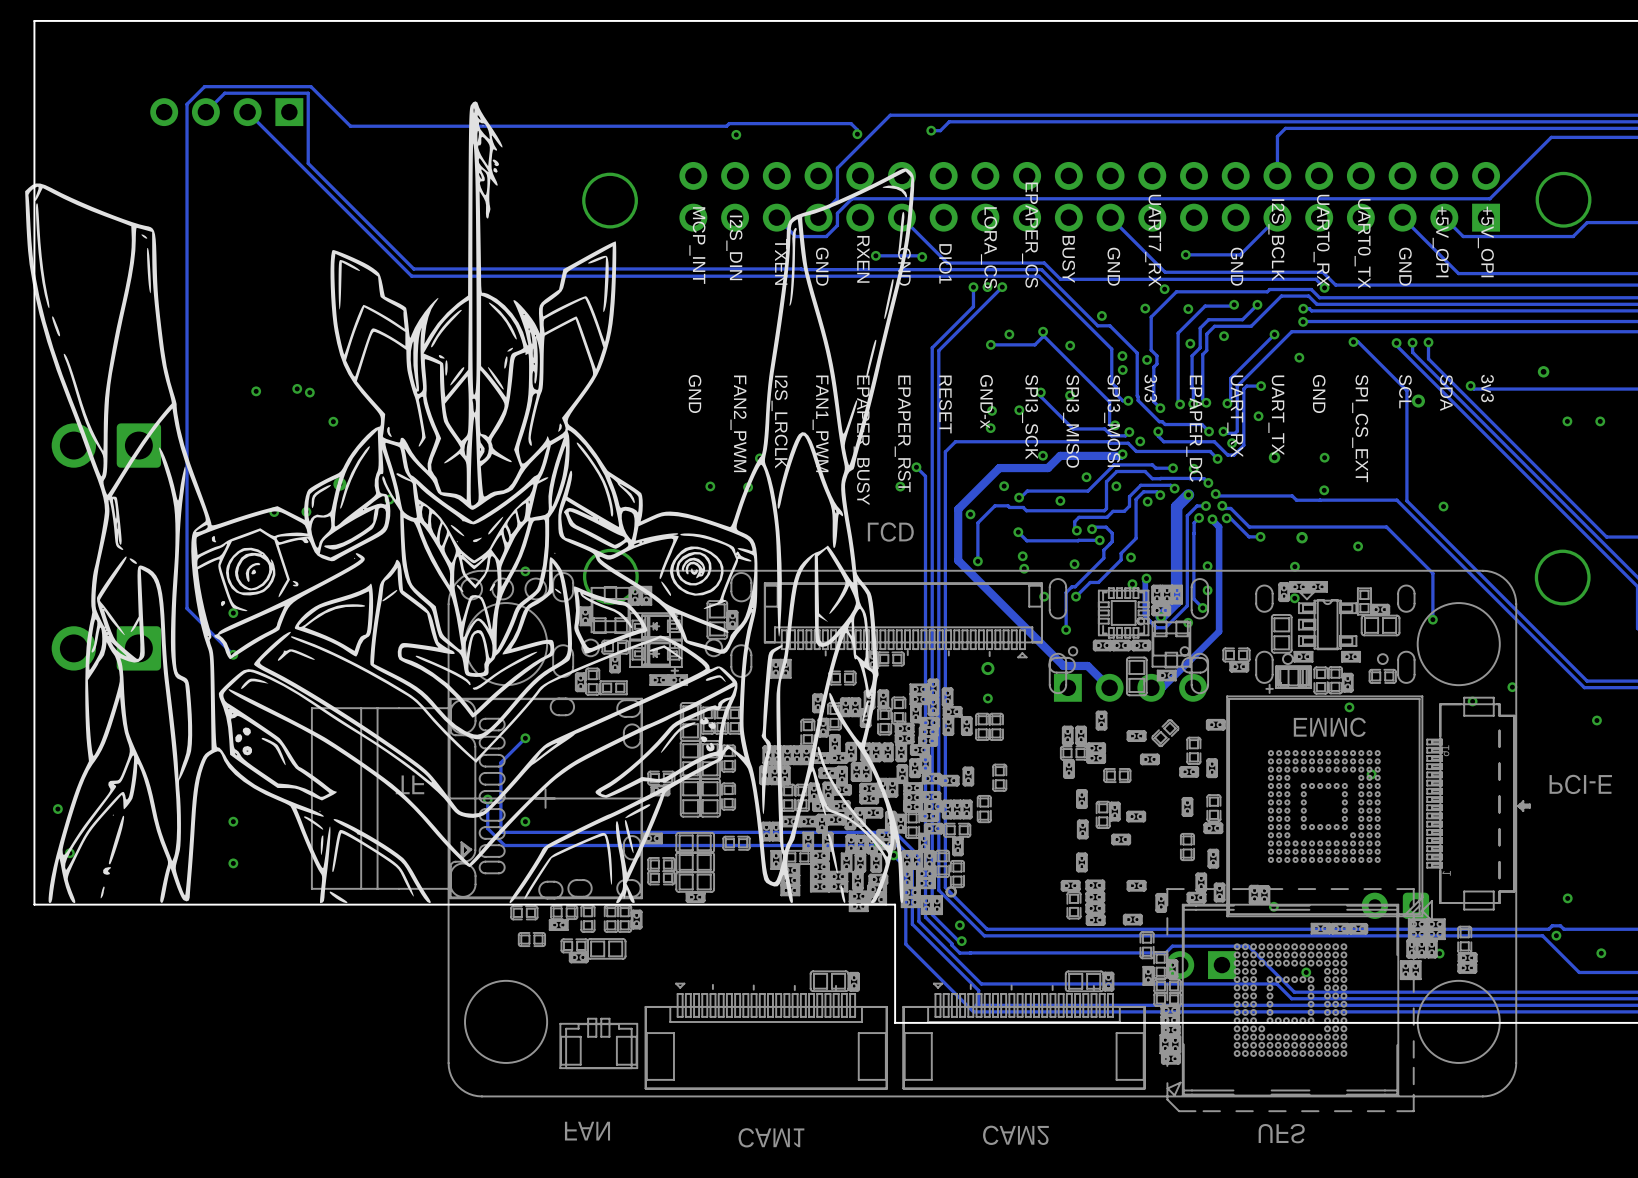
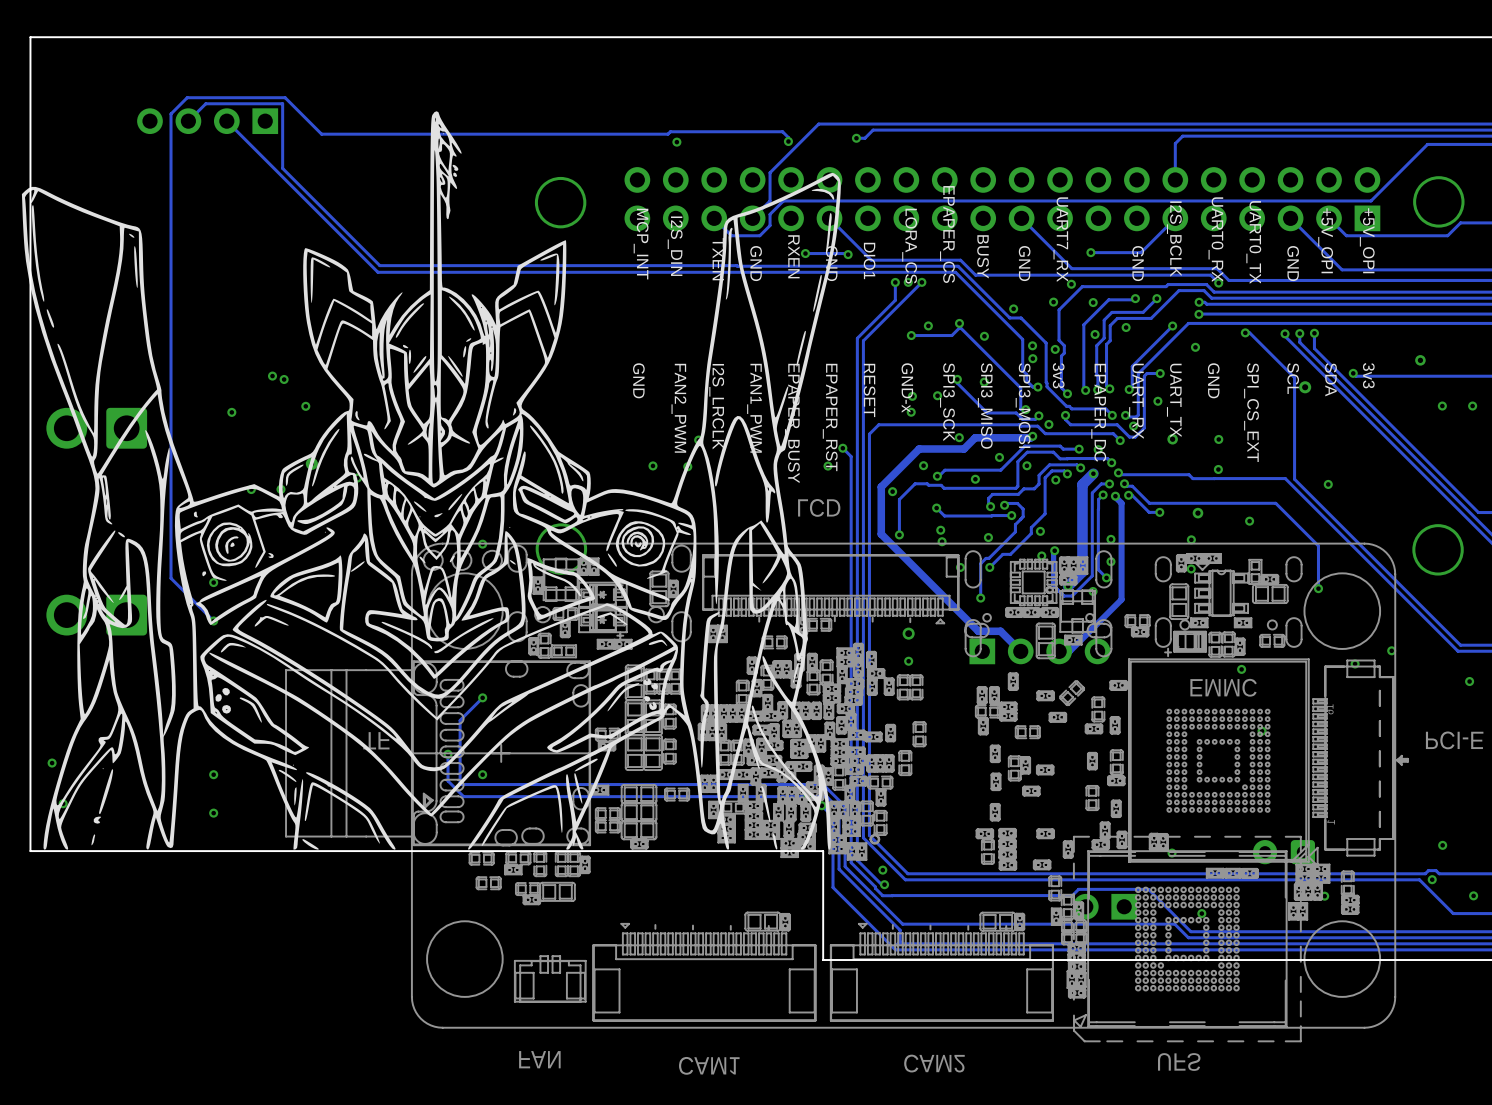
via position: (256, 391) -> (231, 412)

